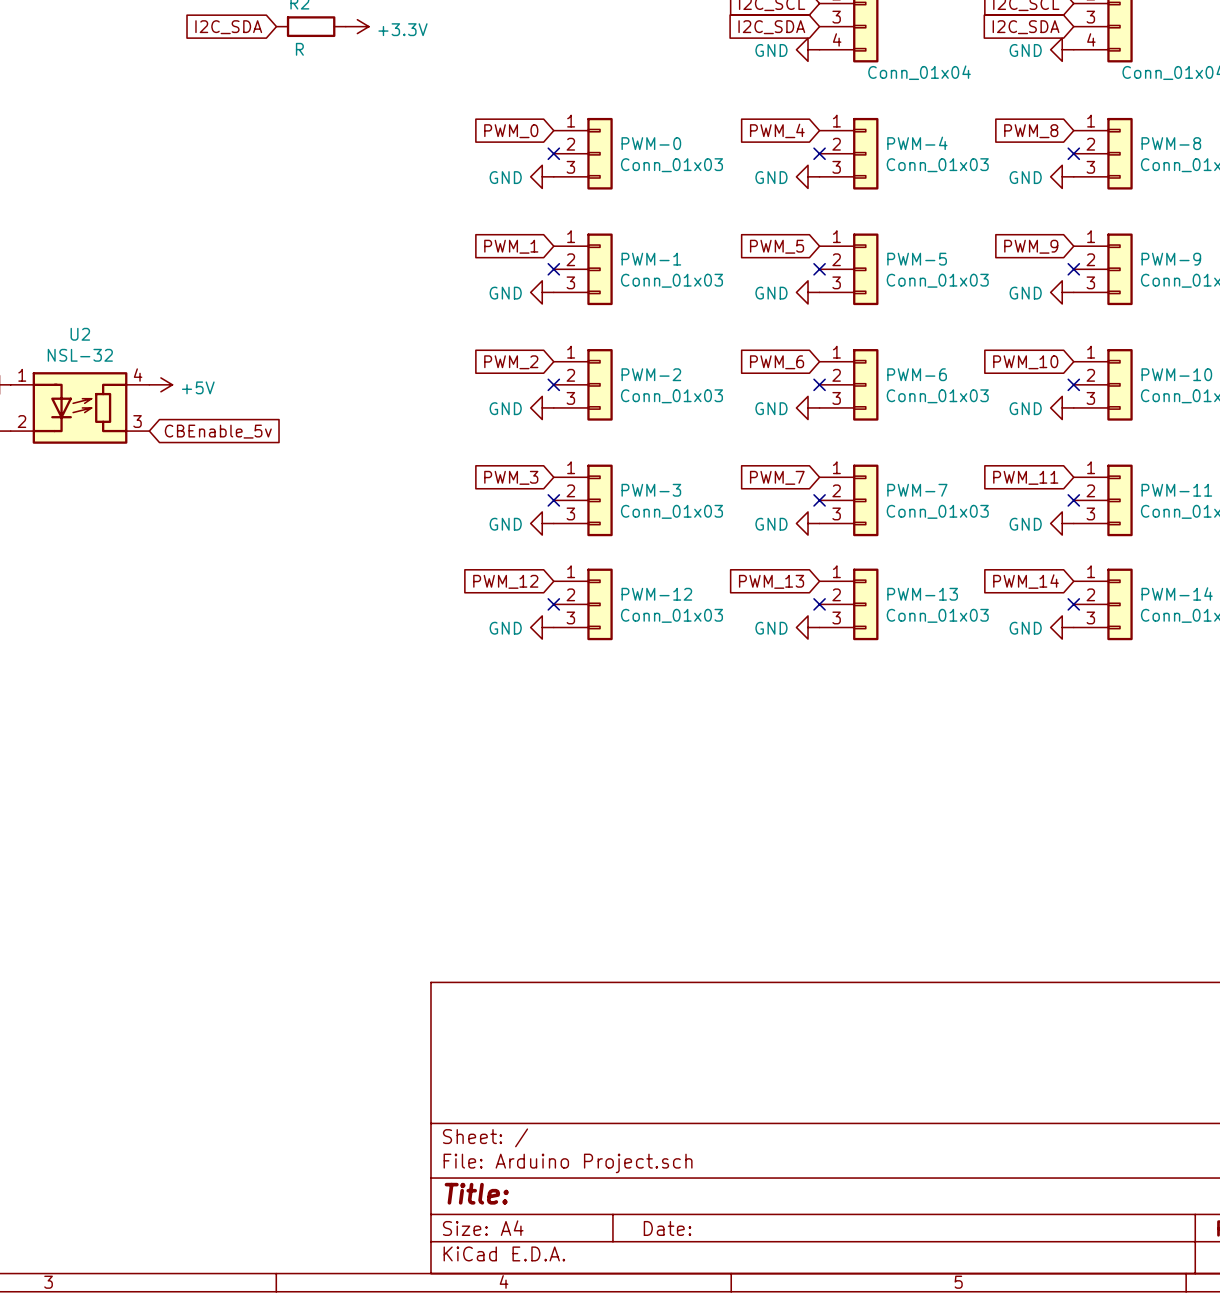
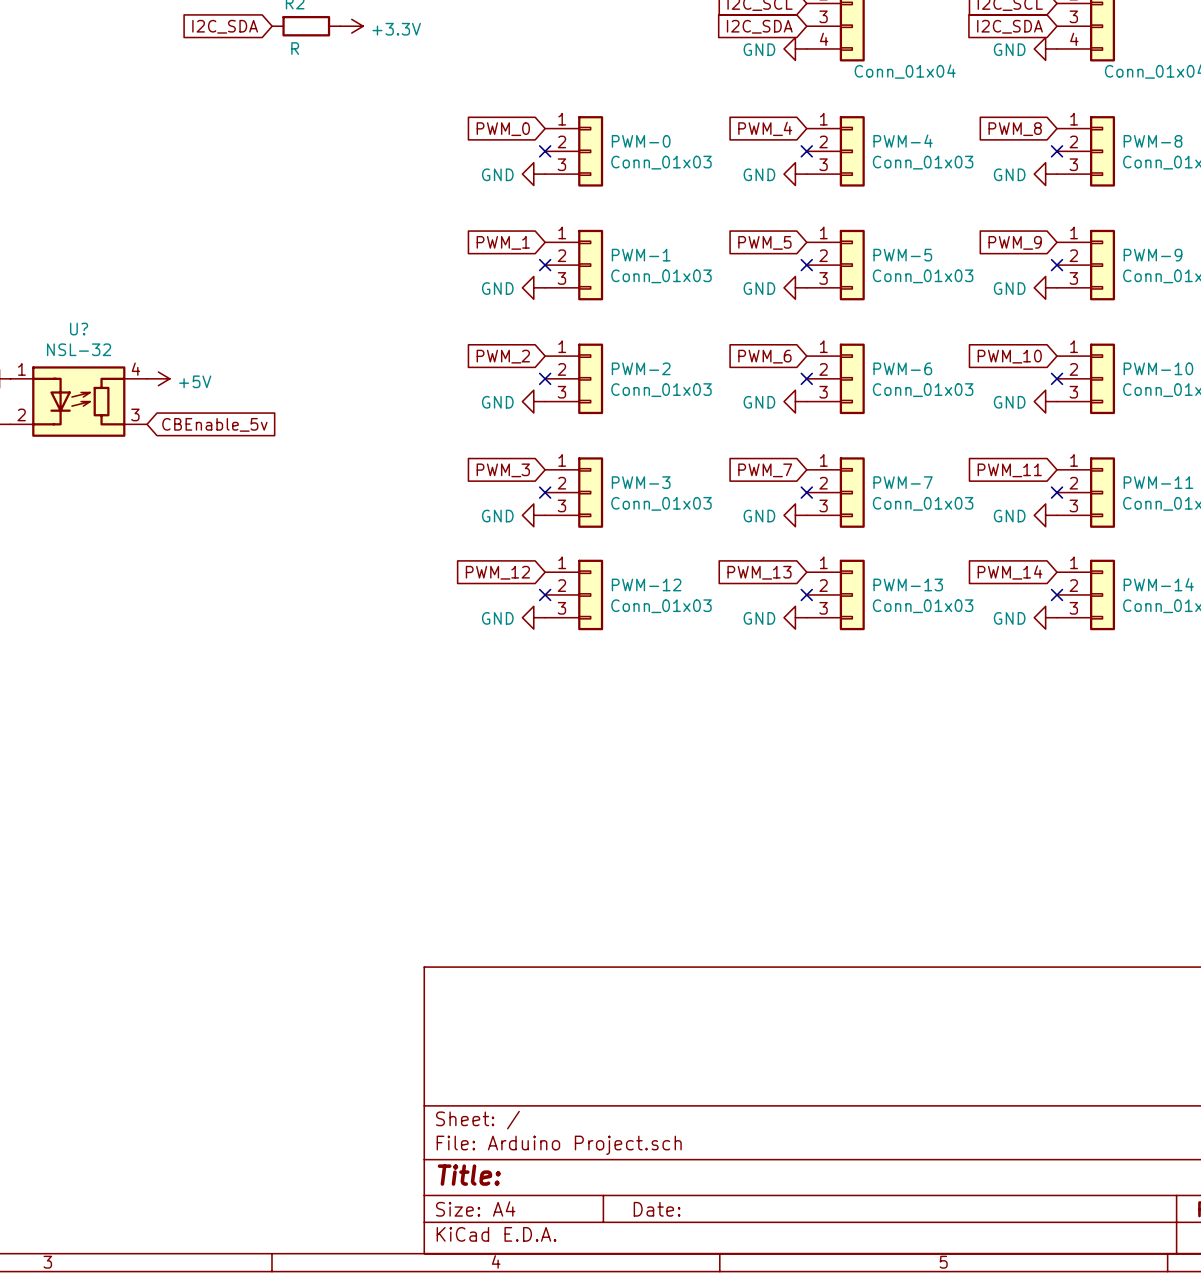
U2 name: U2 (80, 334) -> U? (79, 329)

